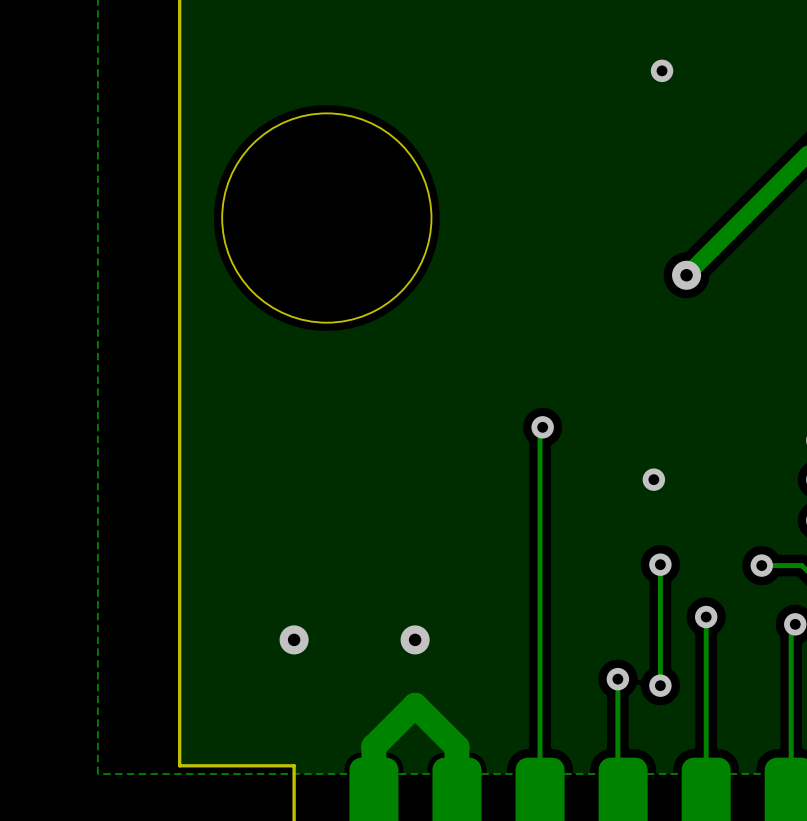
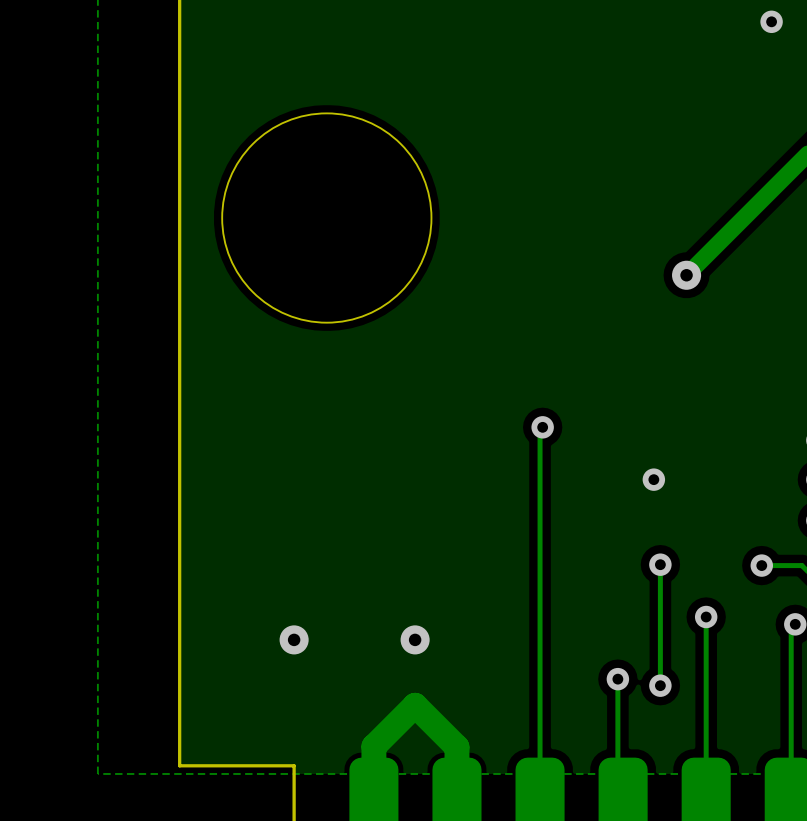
via position: (662, 70) -> (771, 21)

